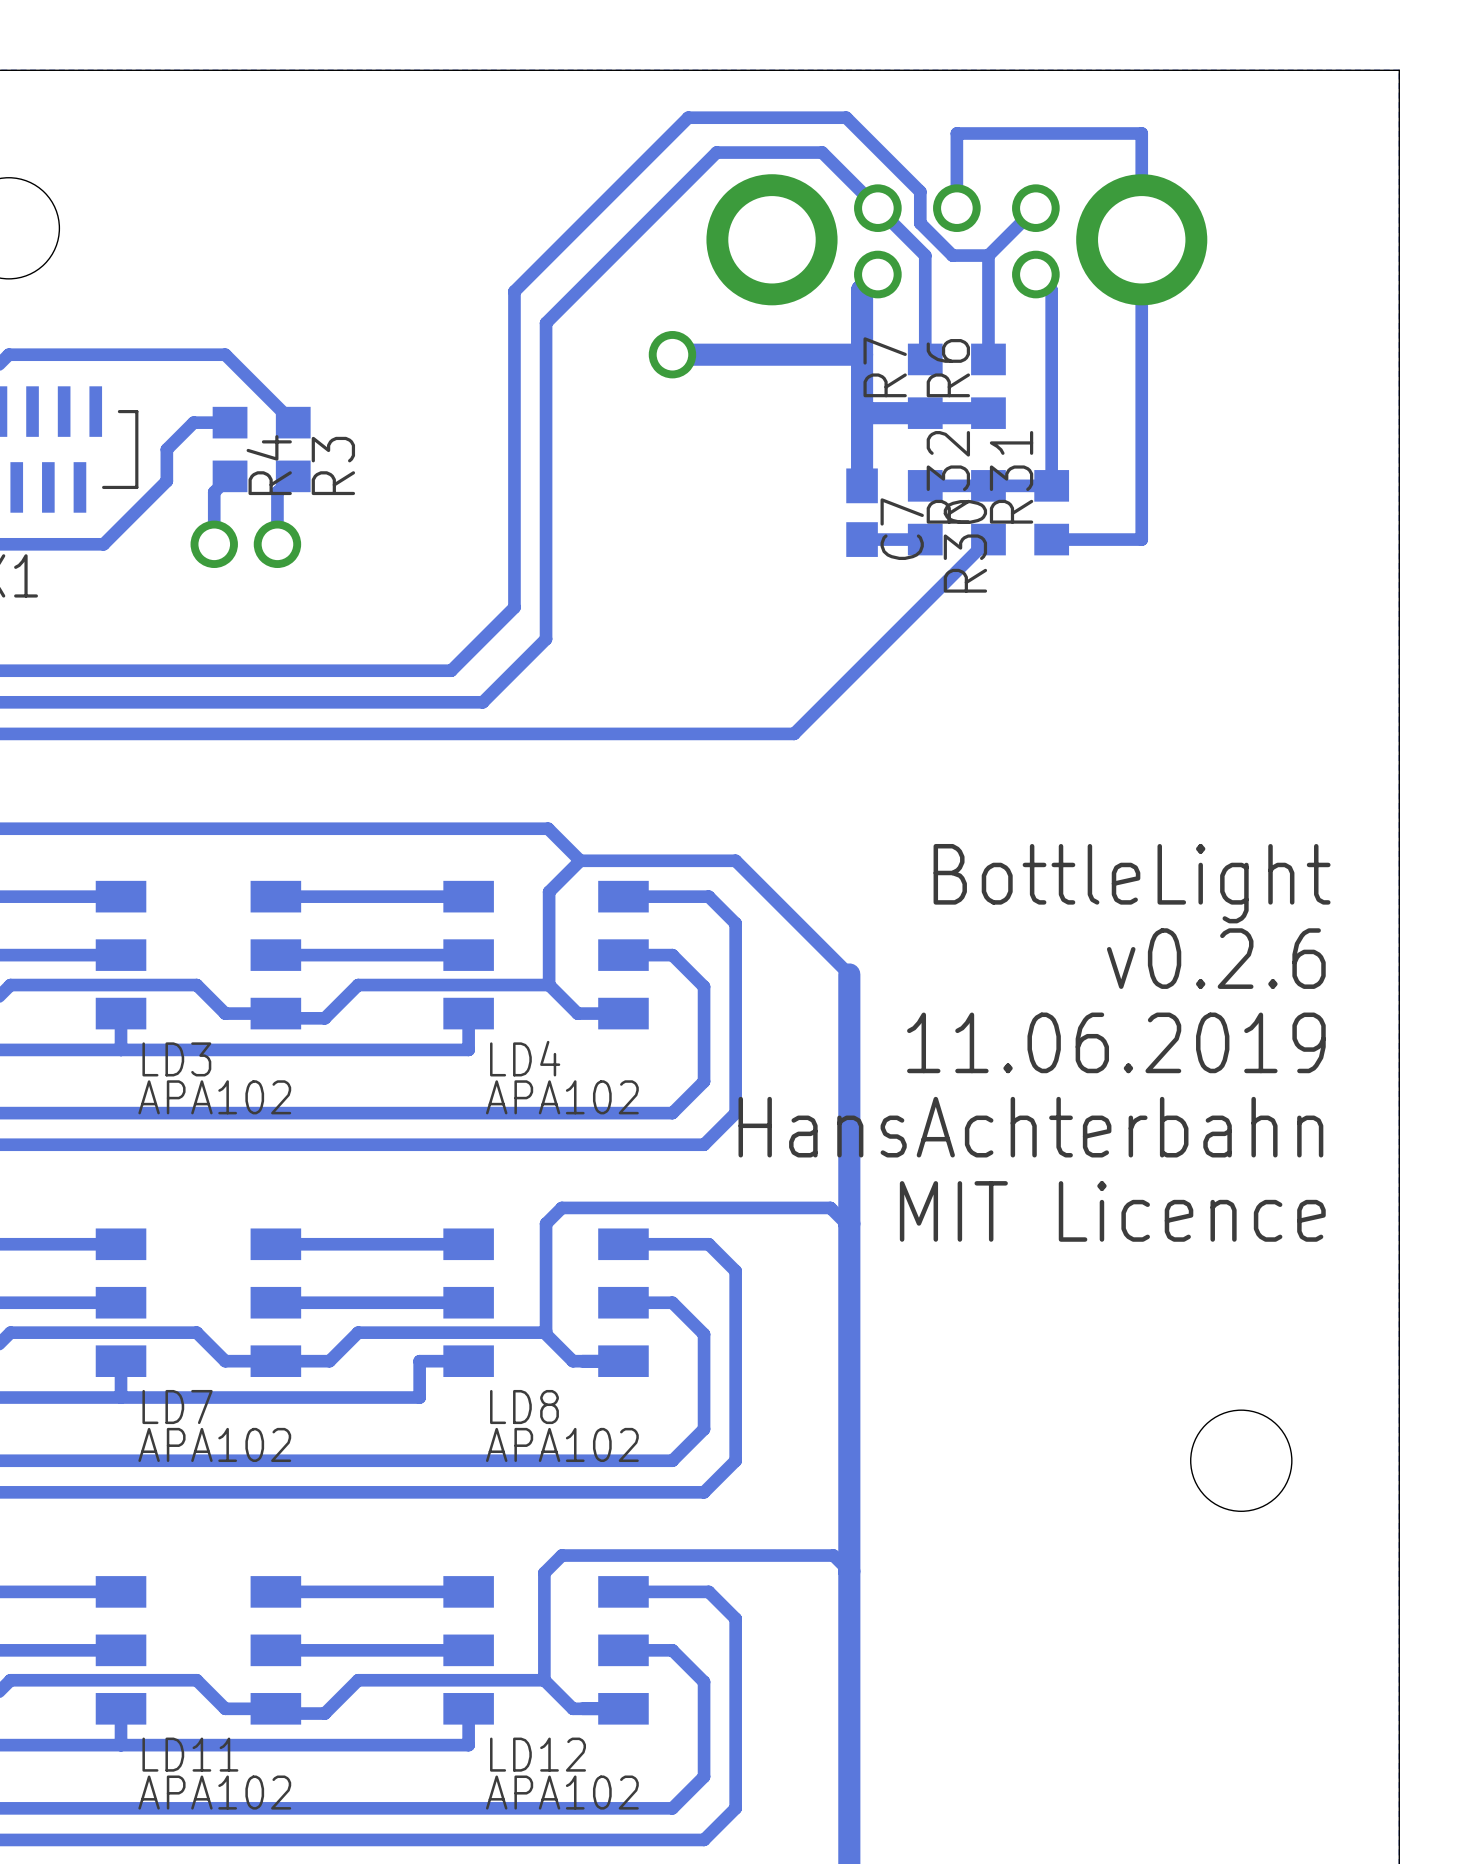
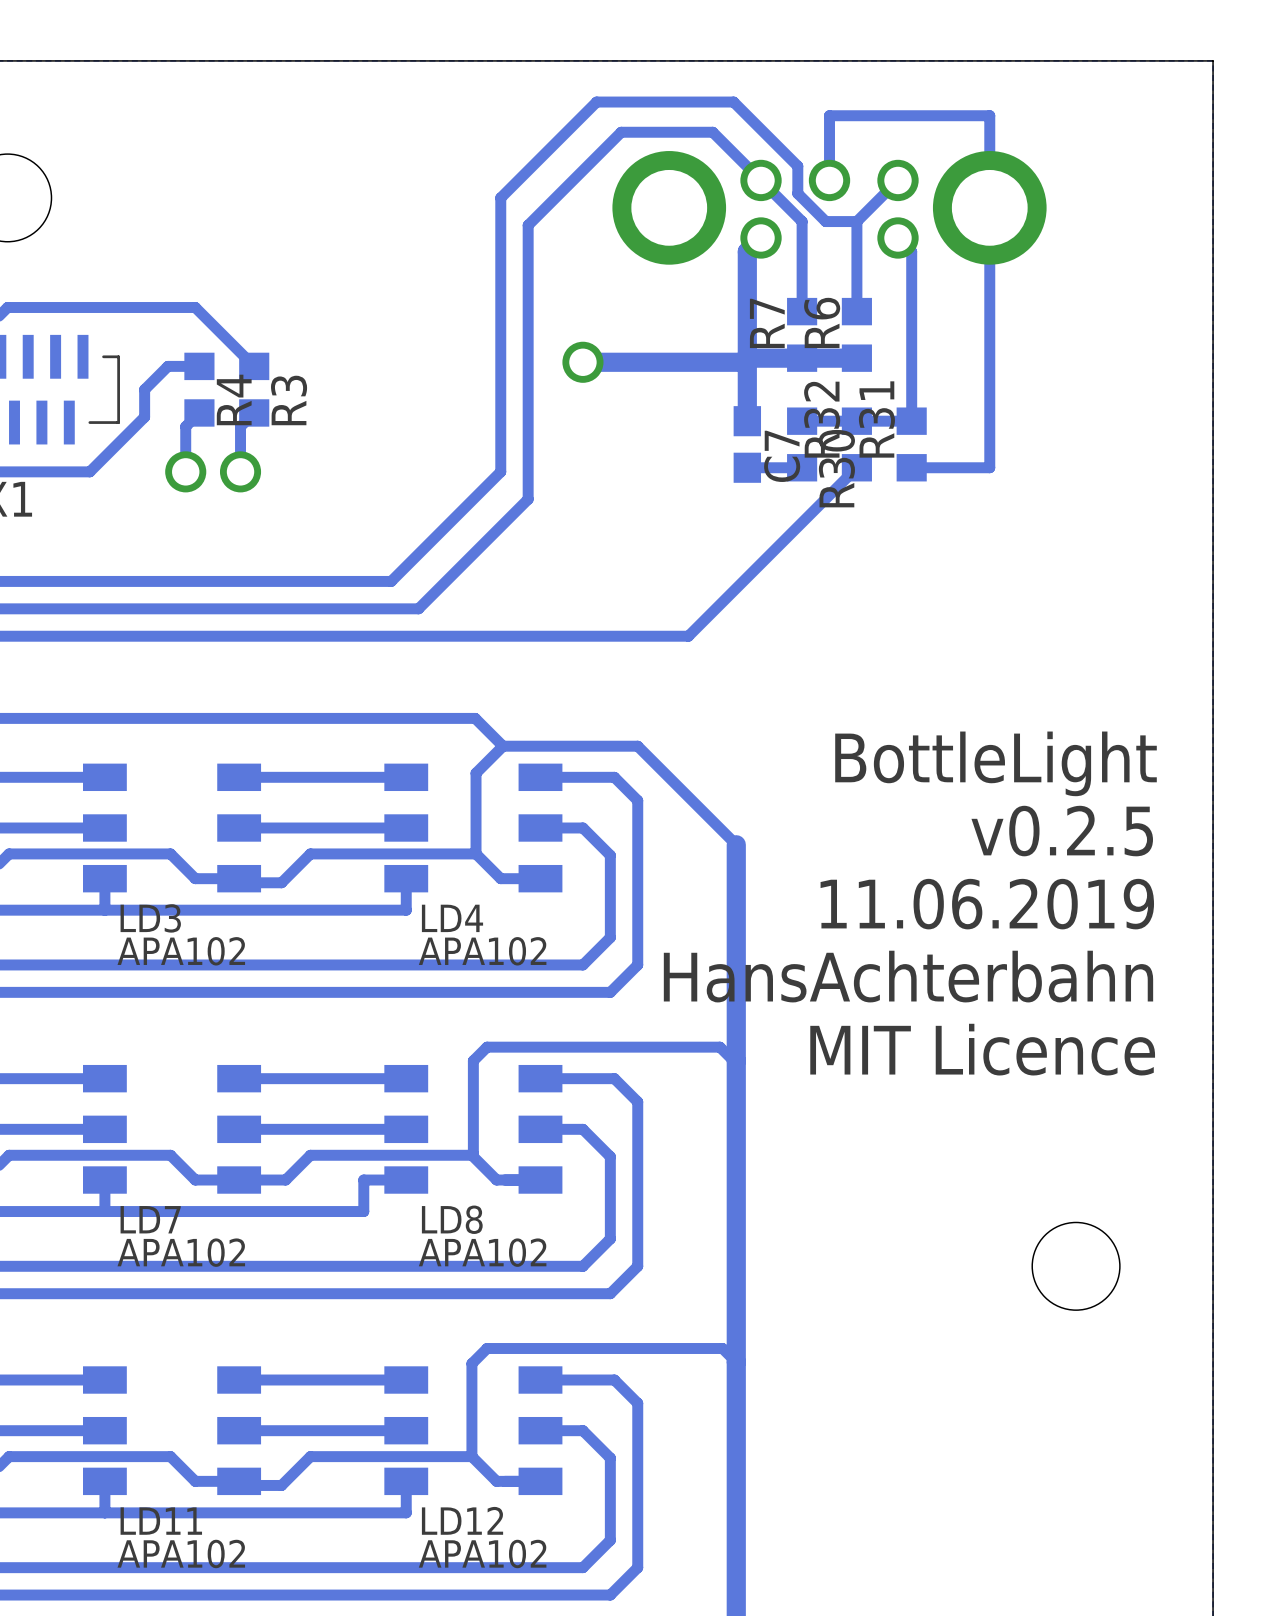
track: (577, 228) (514, 291) (514, 607) -> (500, 197) (500, 471) (445, 526)
track: (609, 259) (546, 323) (546, 639) -> (528, 225) (528, 499) (473, 554)
via position: (672, 354) -> (582, 362)
track: (862, 354) (672, 354) -> (747, 362) (582, 362)
text: v0.2.6 (1216, 958) -> v0.2.5 (1062, 831)

